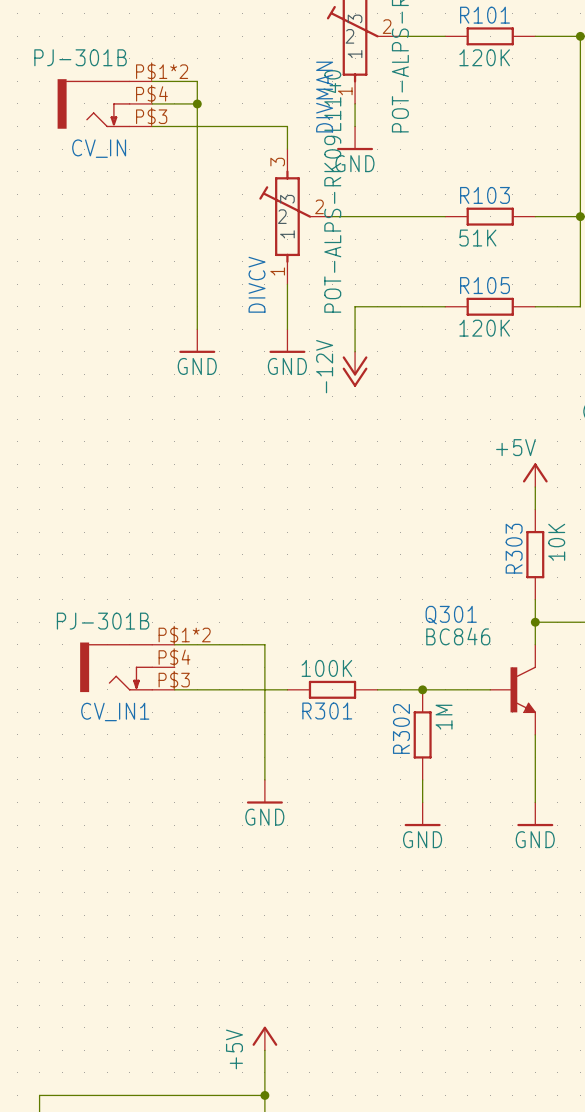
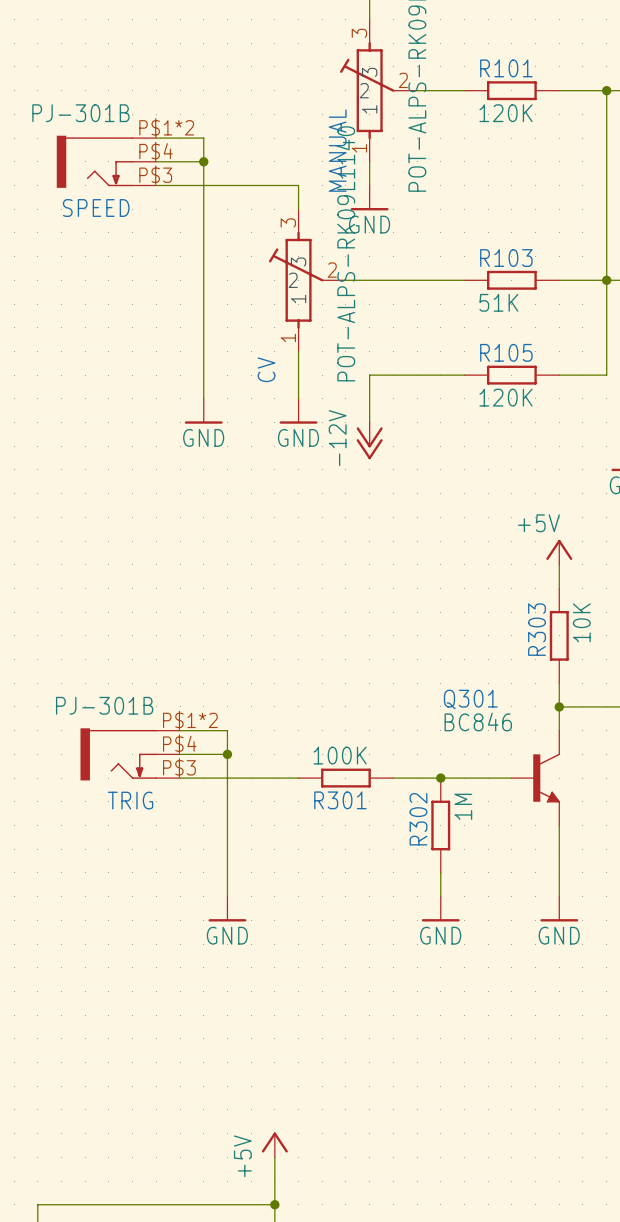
DIVMAN name: DIVMAN (324, 97) -> MANUAL (337, 150)
CV_IN name: CV_IN (99, 148) -> SPEED (96, 208)
DIVCV name: DIVCV (257, 284) -> CV (266, 369)
wire: (219, 644) (264, 644) (264, 779) -> (227, 730) (227, 896)
wire: none -> (180, 754) (227, 754)
junction: none -> (227, 754)
CV_IN1 name: CV_IN1 (115, 711) -> TRIG (130, 800)
power symbol position: GND (264, 791) -> GND (227, 909)

